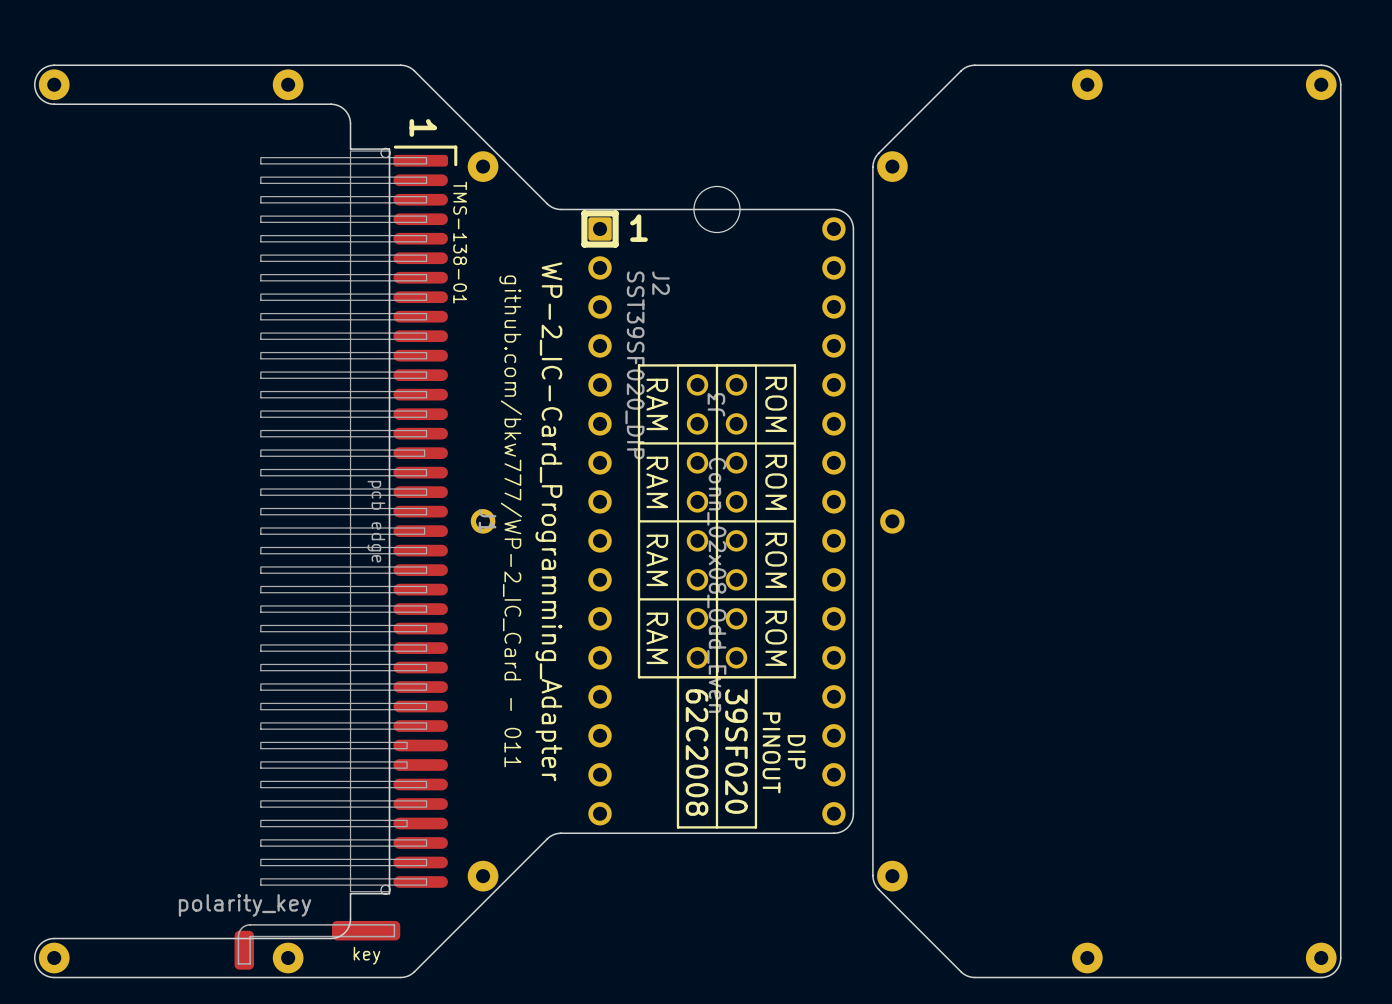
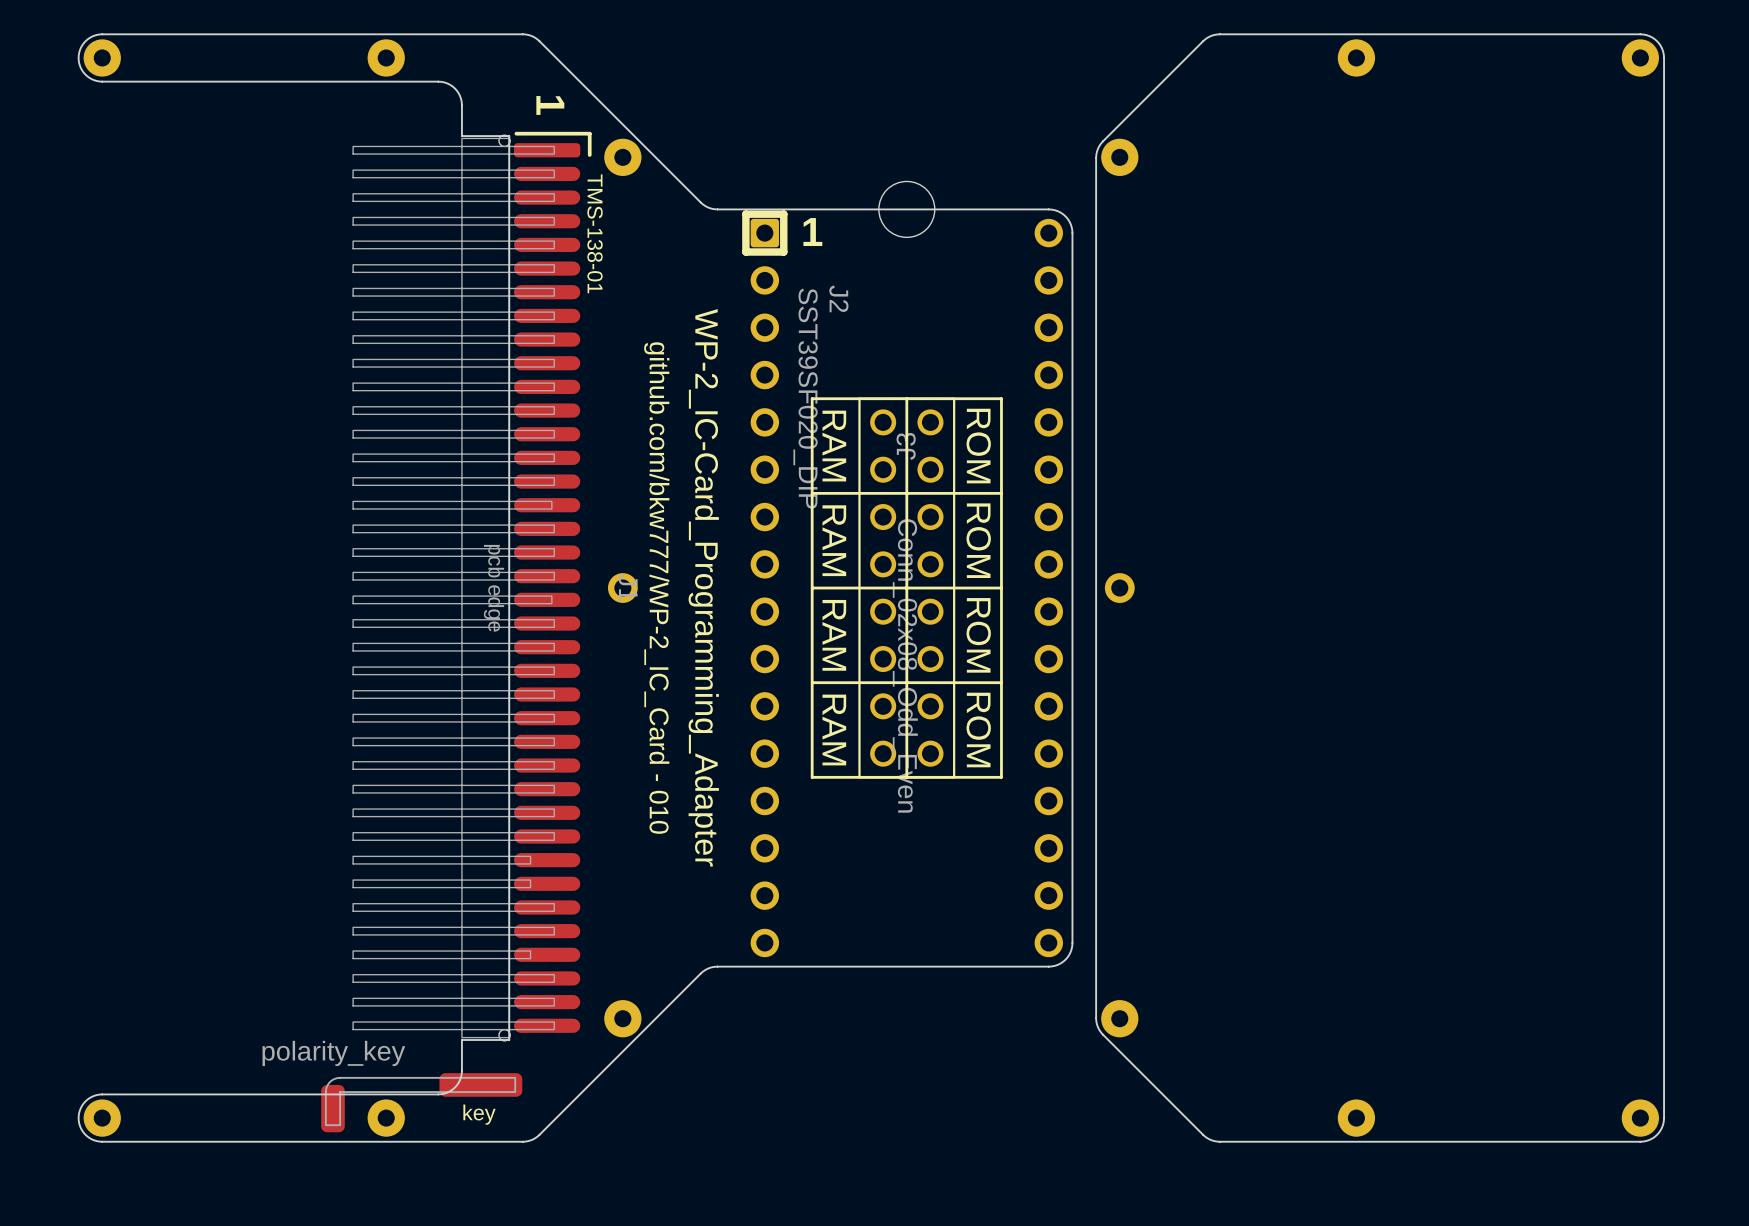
text: github.com/bkw777/WP-2_IC_Card - 011 (510, 521) -> github.com/bkw777/WP-2_IC_Card - 010 (656, 588)
line: (677, 677) (677, 827) (755, 827) (755, 677) -> none
line: (716, 677) (716, 827) -> none
text: 39SF020 (736, 751) -> none
text: 62C2008 (697, 752) -> none
text: PINOUT (771, 752) -> none
text: DIP (796, 752) -> none

